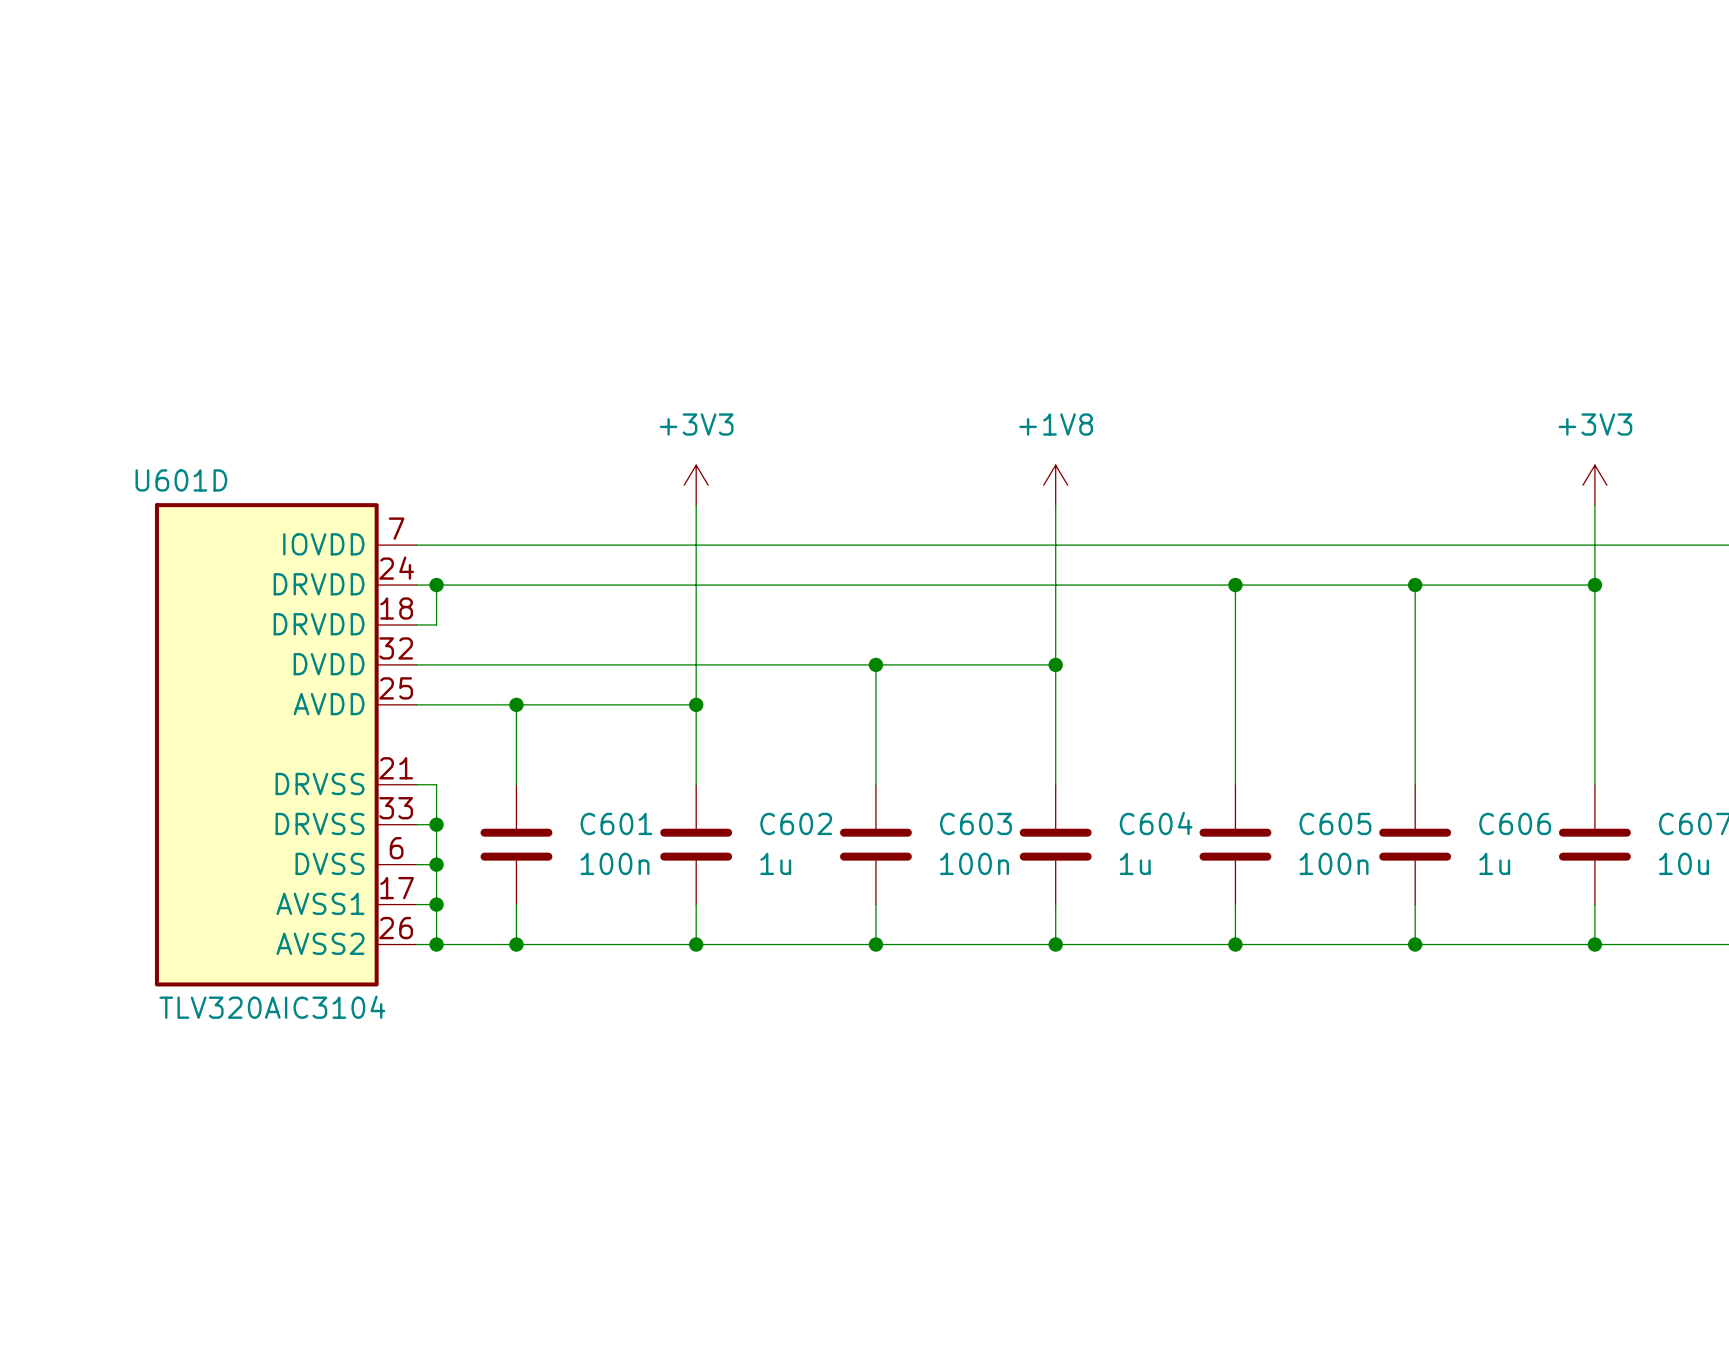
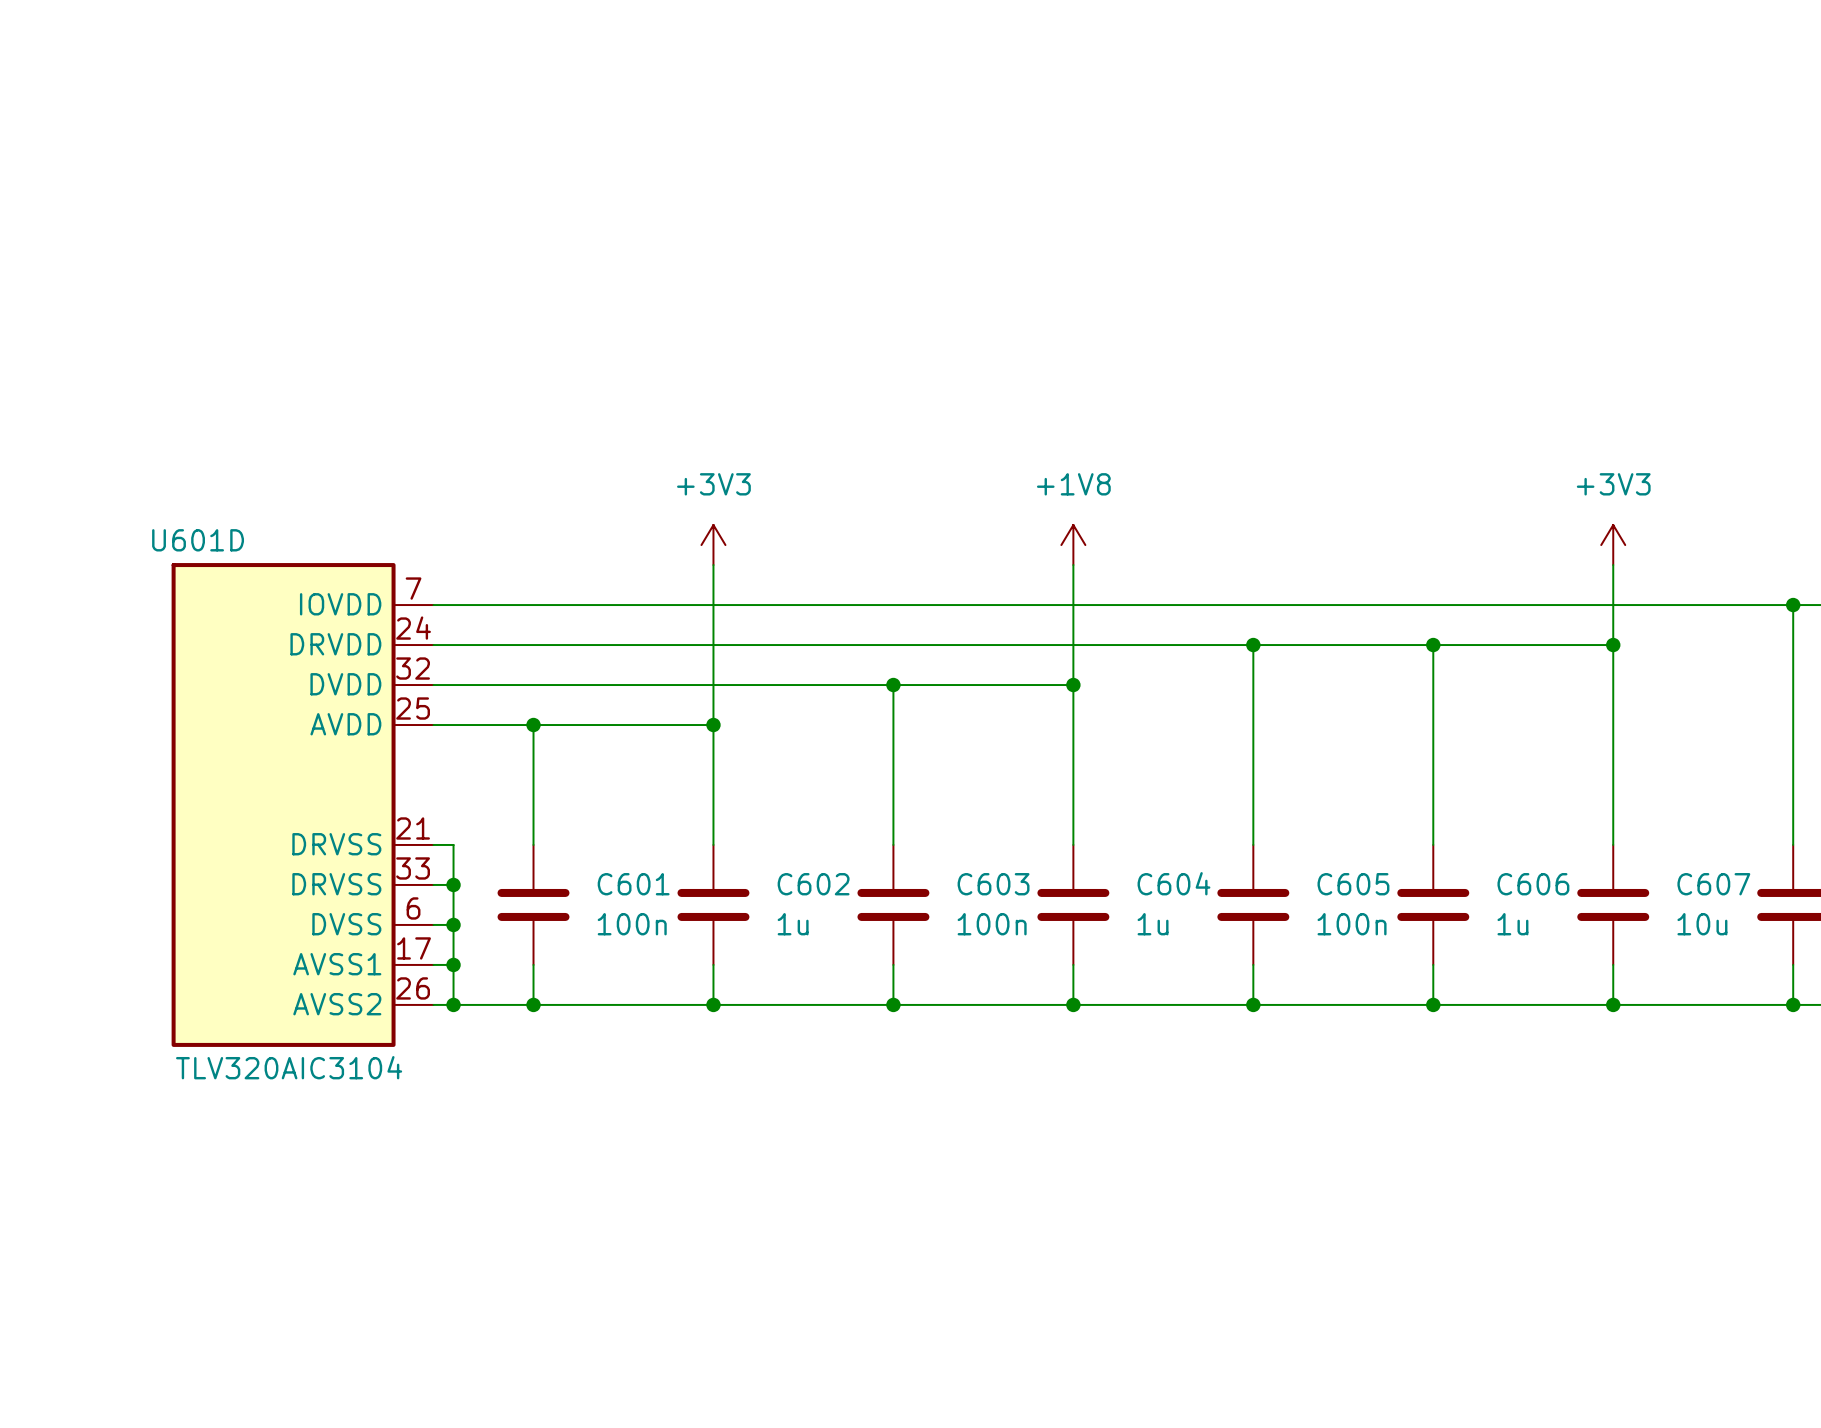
U601D symbol: [154, 503, 417, 987] -> [171, 563, 434, 1047]
wire: (436, 585) (436, 624) -> (1073, 685) (453, 685)
junction: (436, 585) -> none
wire: none -> (893, 685) (893, 725)
wire: none -> (533, 725) (533, 764)
wire: (696, 664) (1055, 664) -> none
junction position: (875, 664) -> (893, 685)
junction position: (1055, 664) -> (1073, 685)
wire: (416, 704) (696, 704) -> none
junction position: (516, 704) -> (533, 725)
junction position: (696, 704) -> (713, 725)

